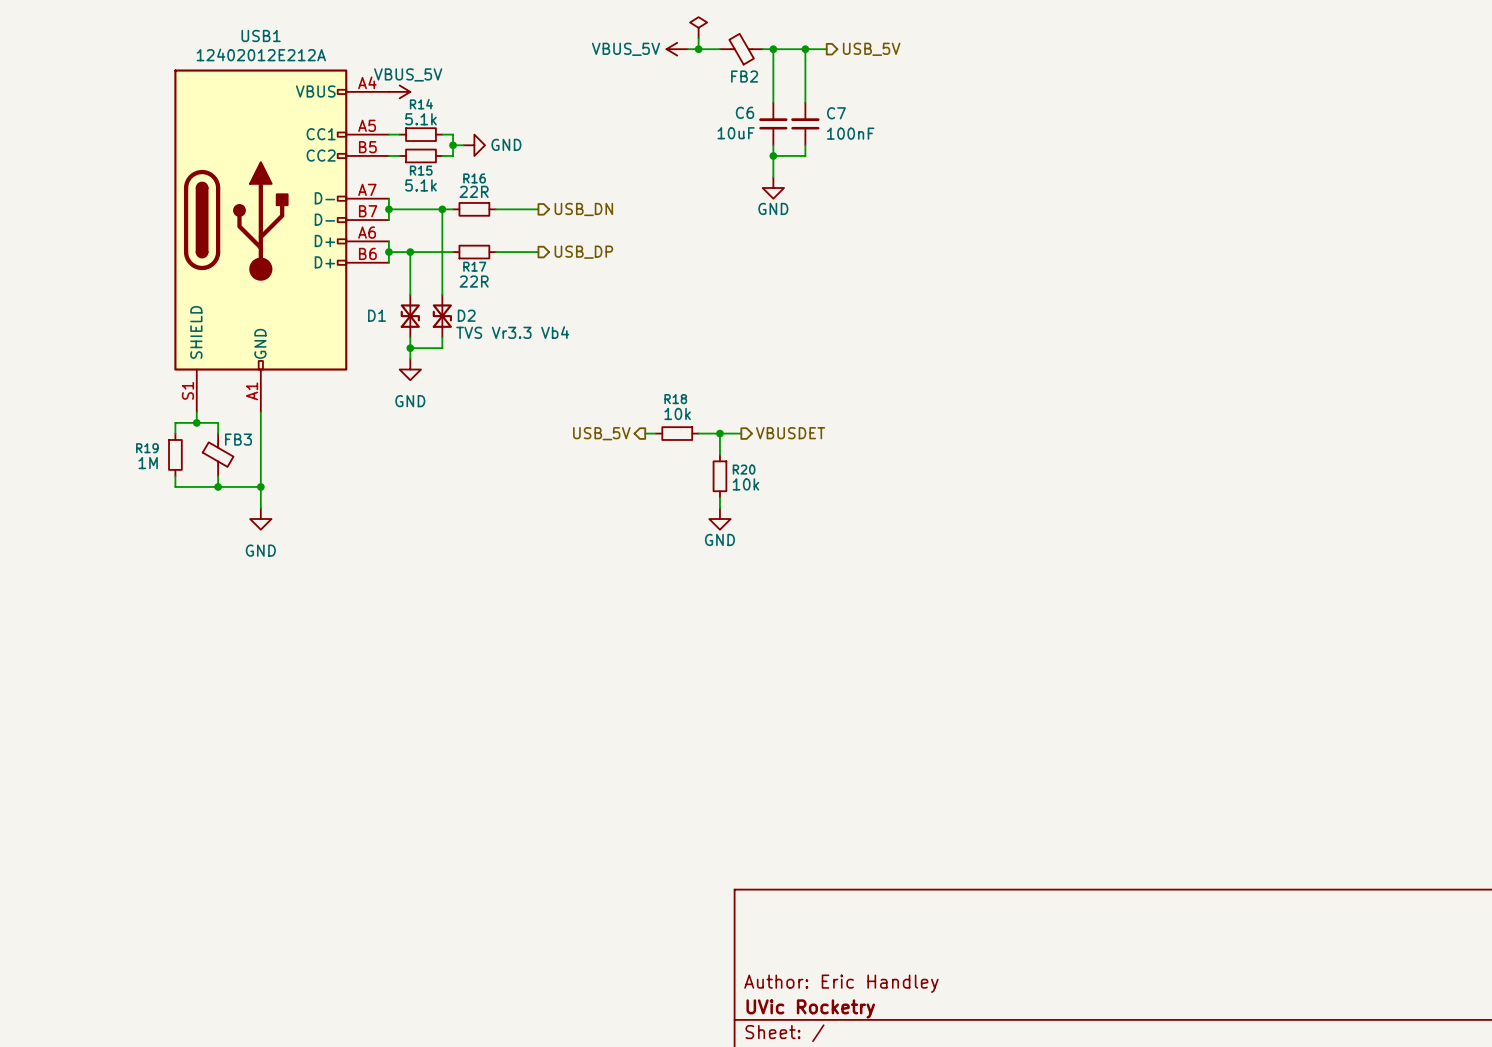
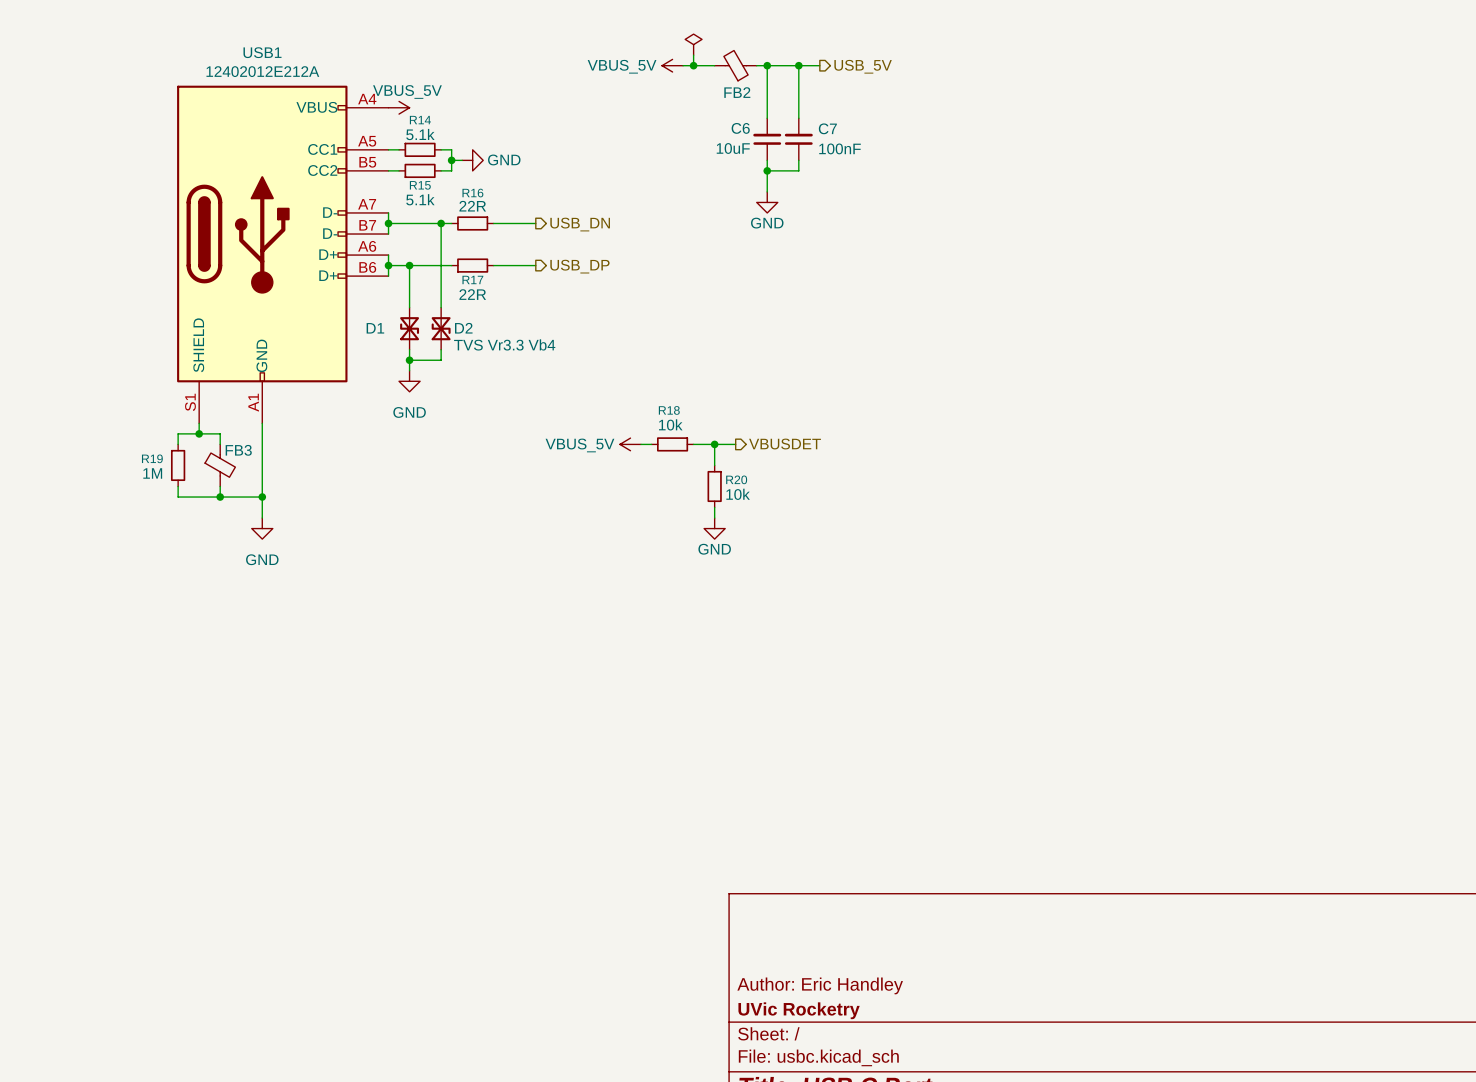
hierarchical label: USB_5V (601, 433) -> none
power symbol: none -> VBUS_5V (630, 444)

